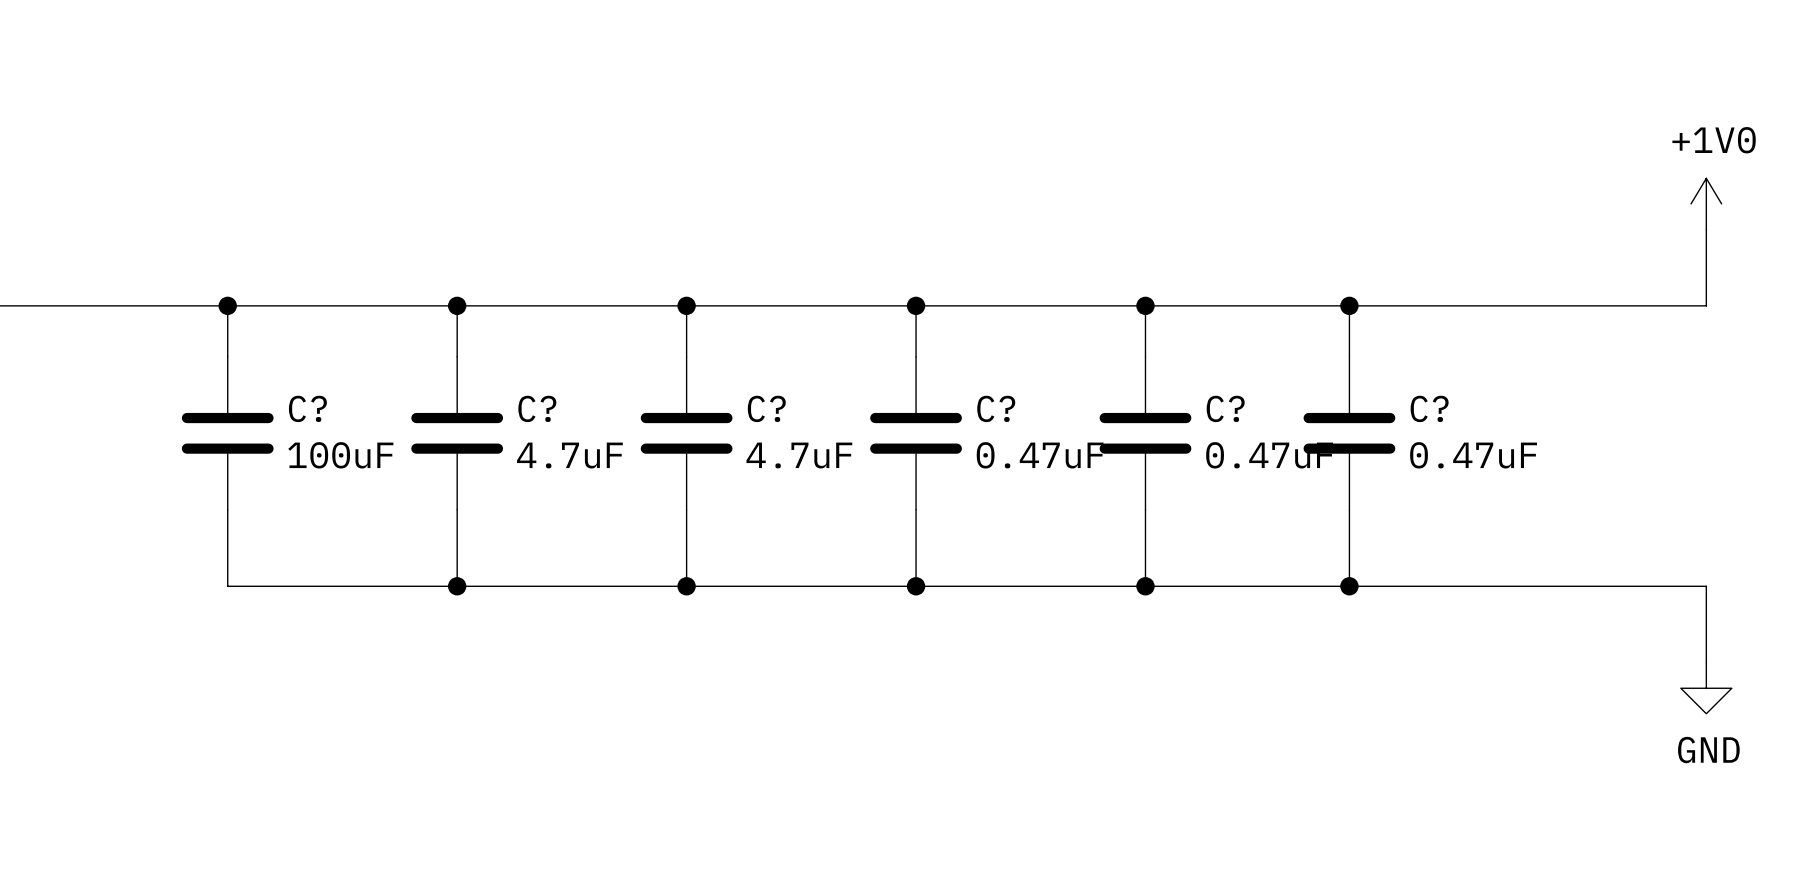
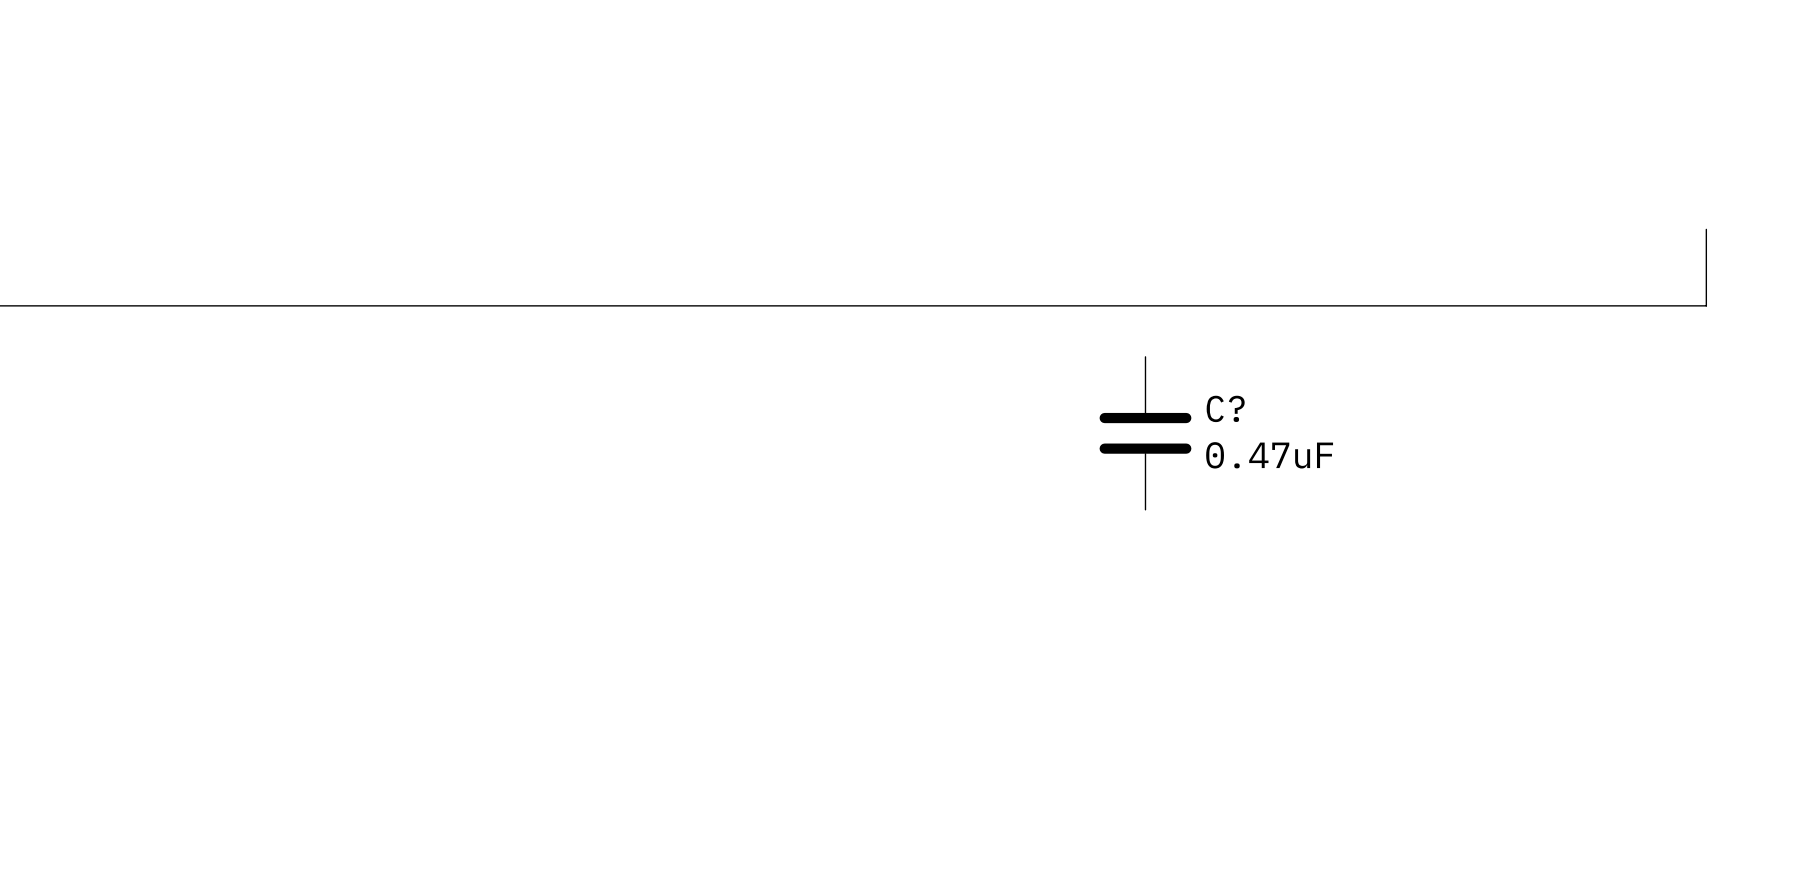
power symbol: +1V0 (1706, 203) -> none
wire: (227, 305) (227, 356) -> none
junction: (227, 305) -> none
wire: (457, 305) (457, 356) -> none
junction: (457, 305) -> none
wire: (686, 305) (686, 356) -> none
junction: (686, 305) -> none
wire: (916, 305) (916, 356) -> none
junction: (916, 305) -> none
wire: (1145, 305) (1145, 356) -> none
junction: (1145, 305) -> none
wire: (1349, 305) (1349, 356) -> none
junction: (1349, 305) -> none
C?: 100uF (227, 433) -> none
C?: 4.7uF (457, 433) -> none
C?: 4.7uF (686, 433) -> none
C?: 0.47uF (916, 433) -> none
C?: 0.47uF (1349, 433) -> none
wire: (227, 509) (227, 586) (1706, 586) (1706, 662) -> none
wire: (457, 509) (457, 586) -> none
wire: (686, 509) (686, 586) -> none
wire: (916, 509) (916, 586) -> none
wire: (1145, 509) (1145, 586) -> none
wire: (1349, 509) (1349, 586) -> none
junction: (457, 586) -> none
junction: (686, 586) -> none
junction: (916, 586) -> none
junction: (1145, 586) -> none
junction: (1349, 586) -> none
power symbol: GND (1706, 688) -> none

